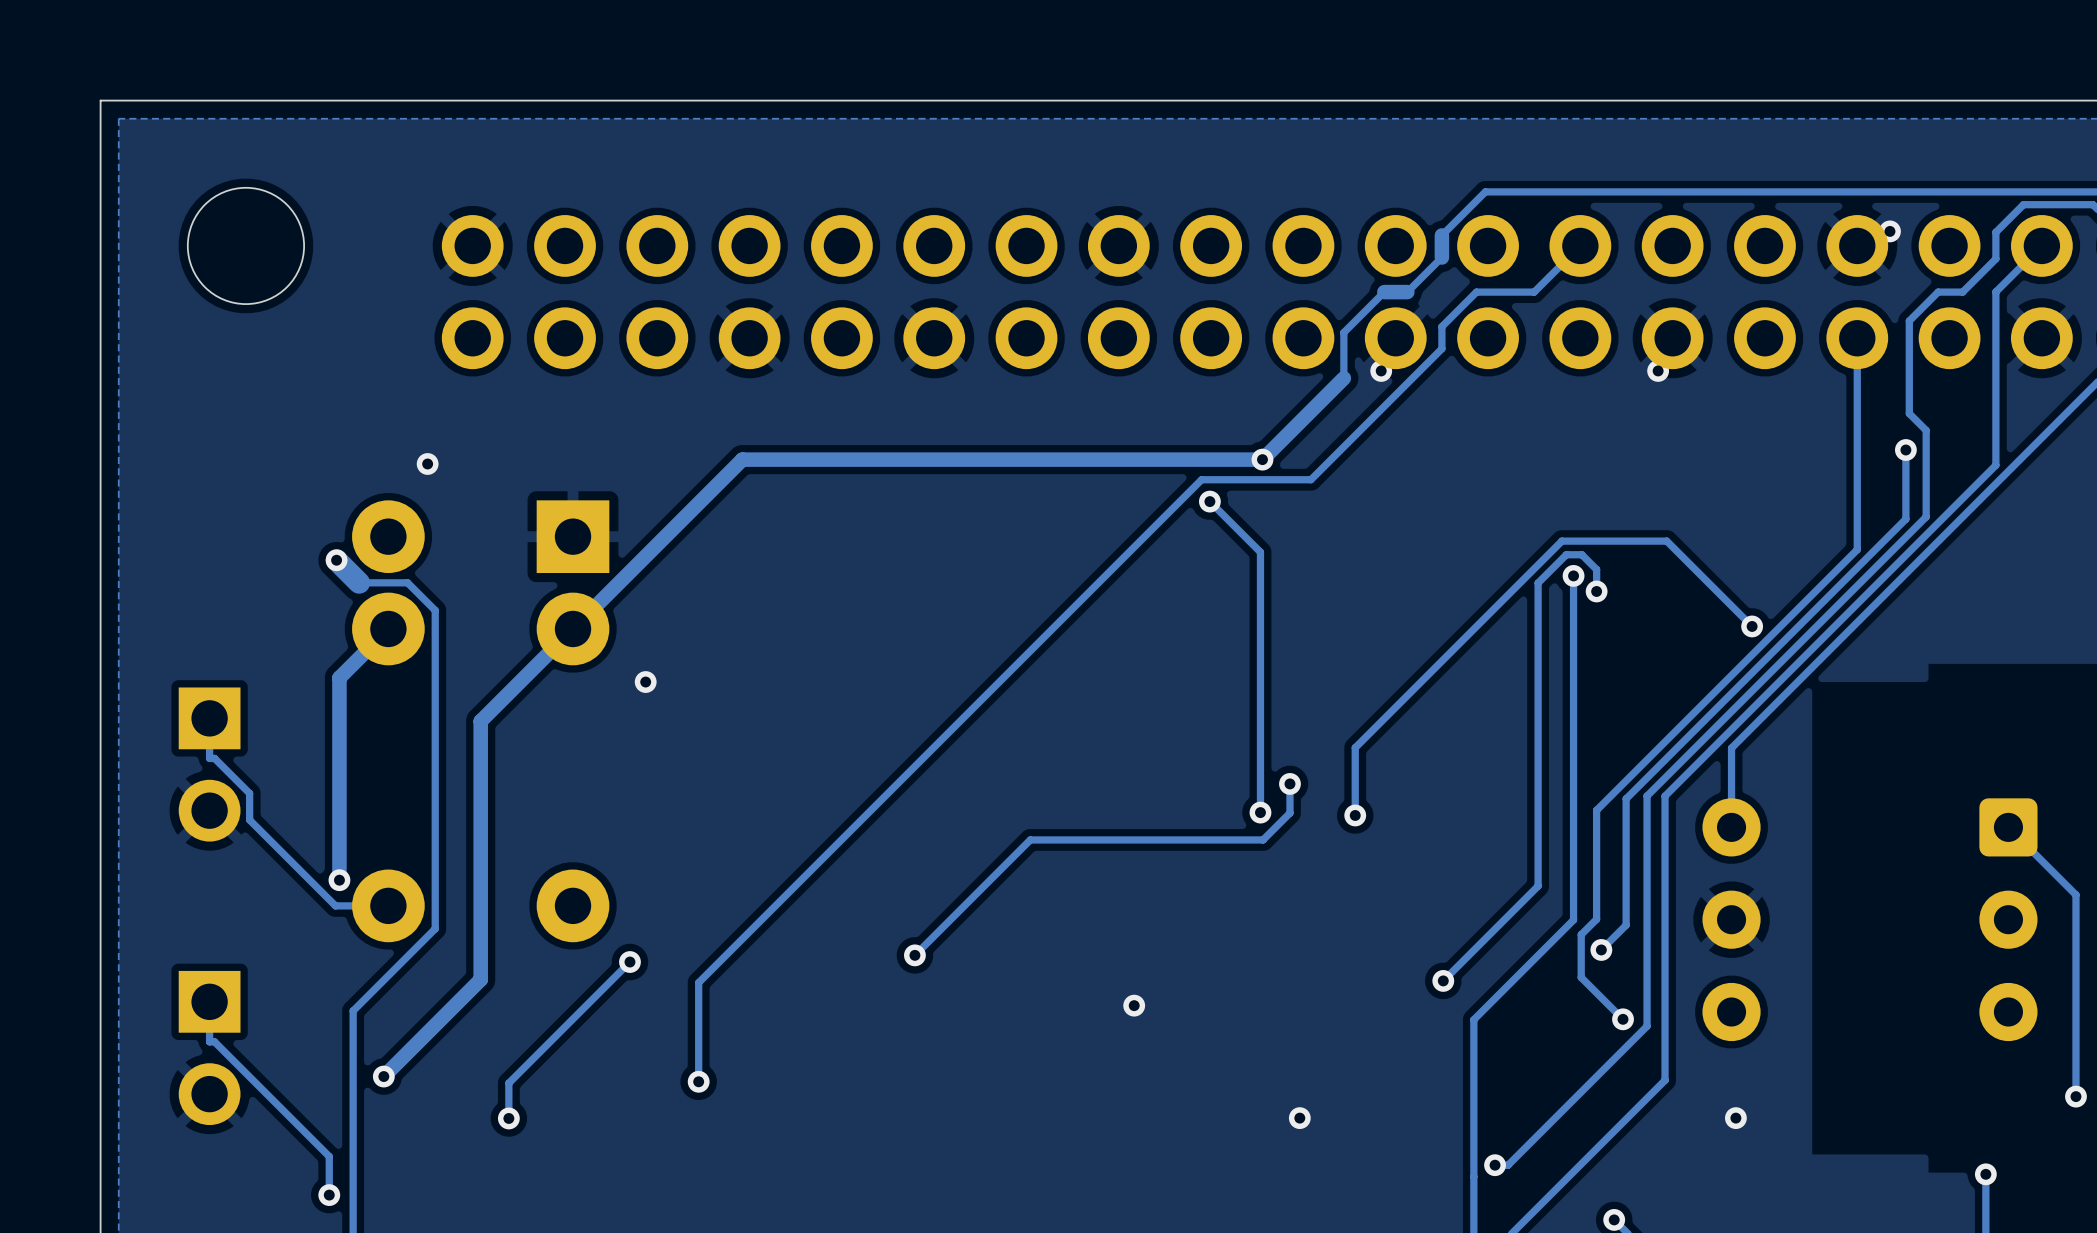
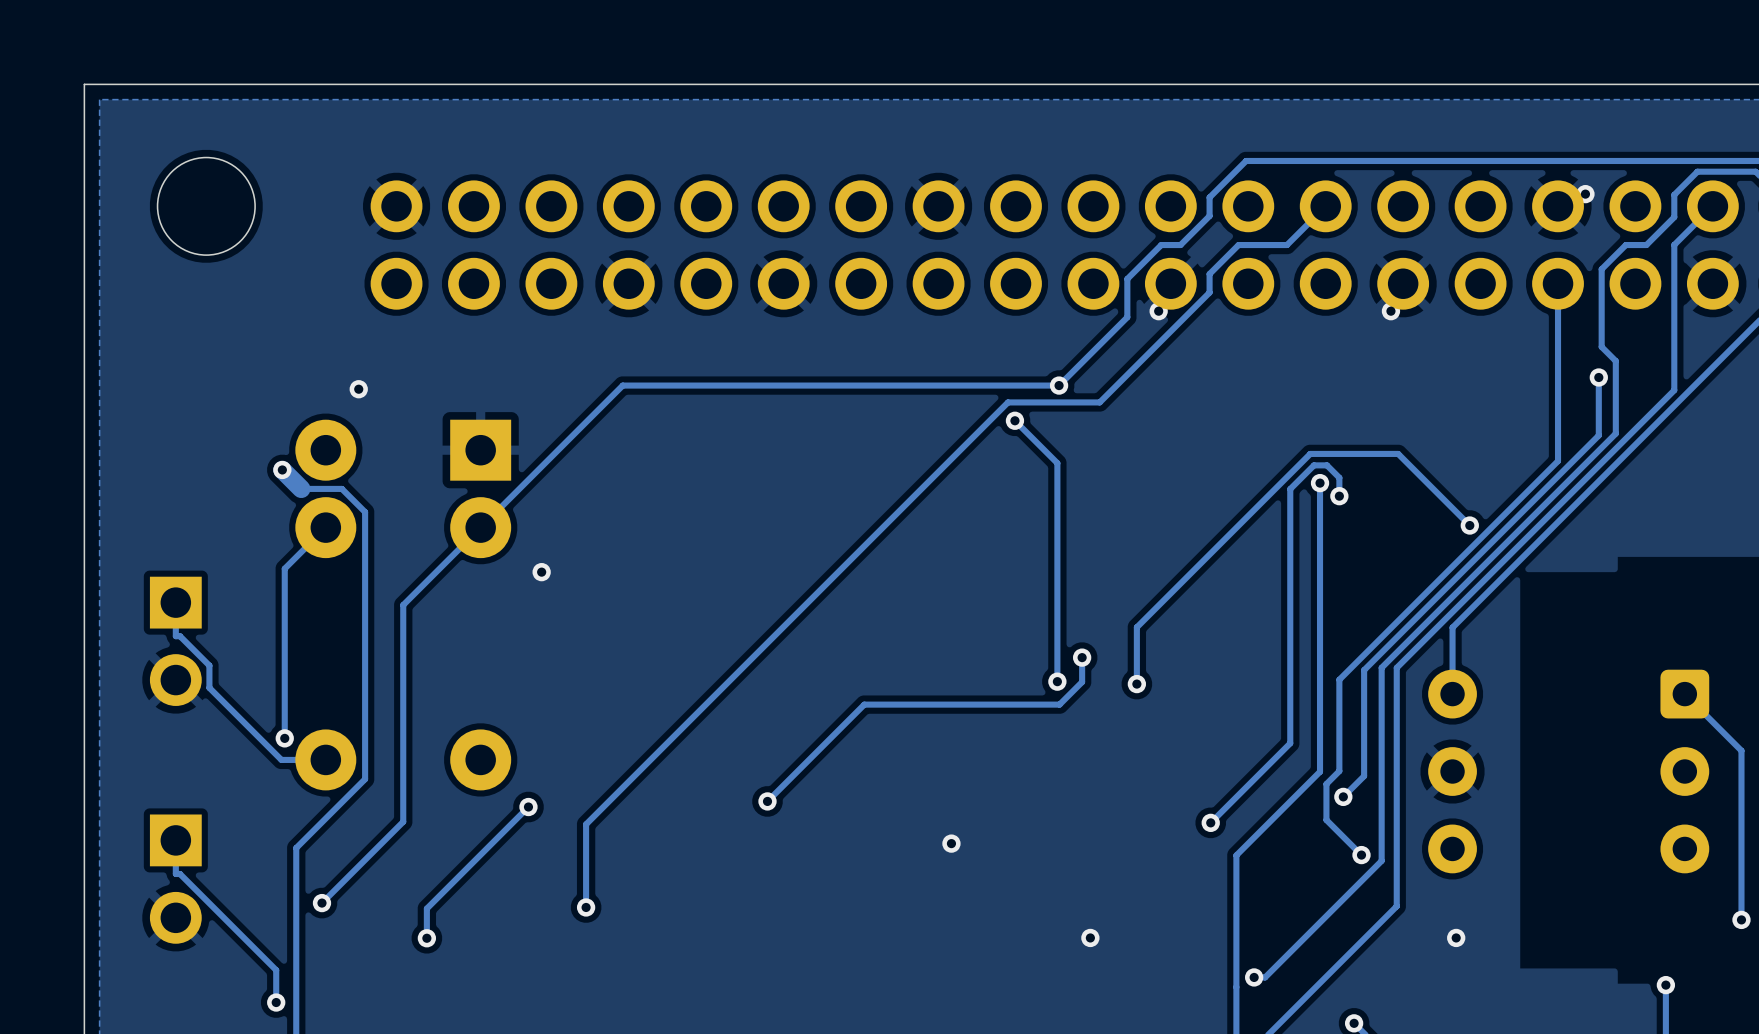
track width: thick (1441, 235) (1441, 257) -> thin (1209, 197) (1209, 216)
track width: thick (1407, 292) (1384, 292) -> thin (1180, 245) (1161, 245)
track width: thick (1343, 378) (1262, 459) (742, 459) (480, 721) (480, 979) (383, 1076) -> thin (1127, 317) (1059, 385) (622, 385) (403, 605) (403, 821) (321, 903)
track width: thick (388, 628) (339, 677) (339, 880) -> thin (325, 527) (284, 568) (284, 738)

